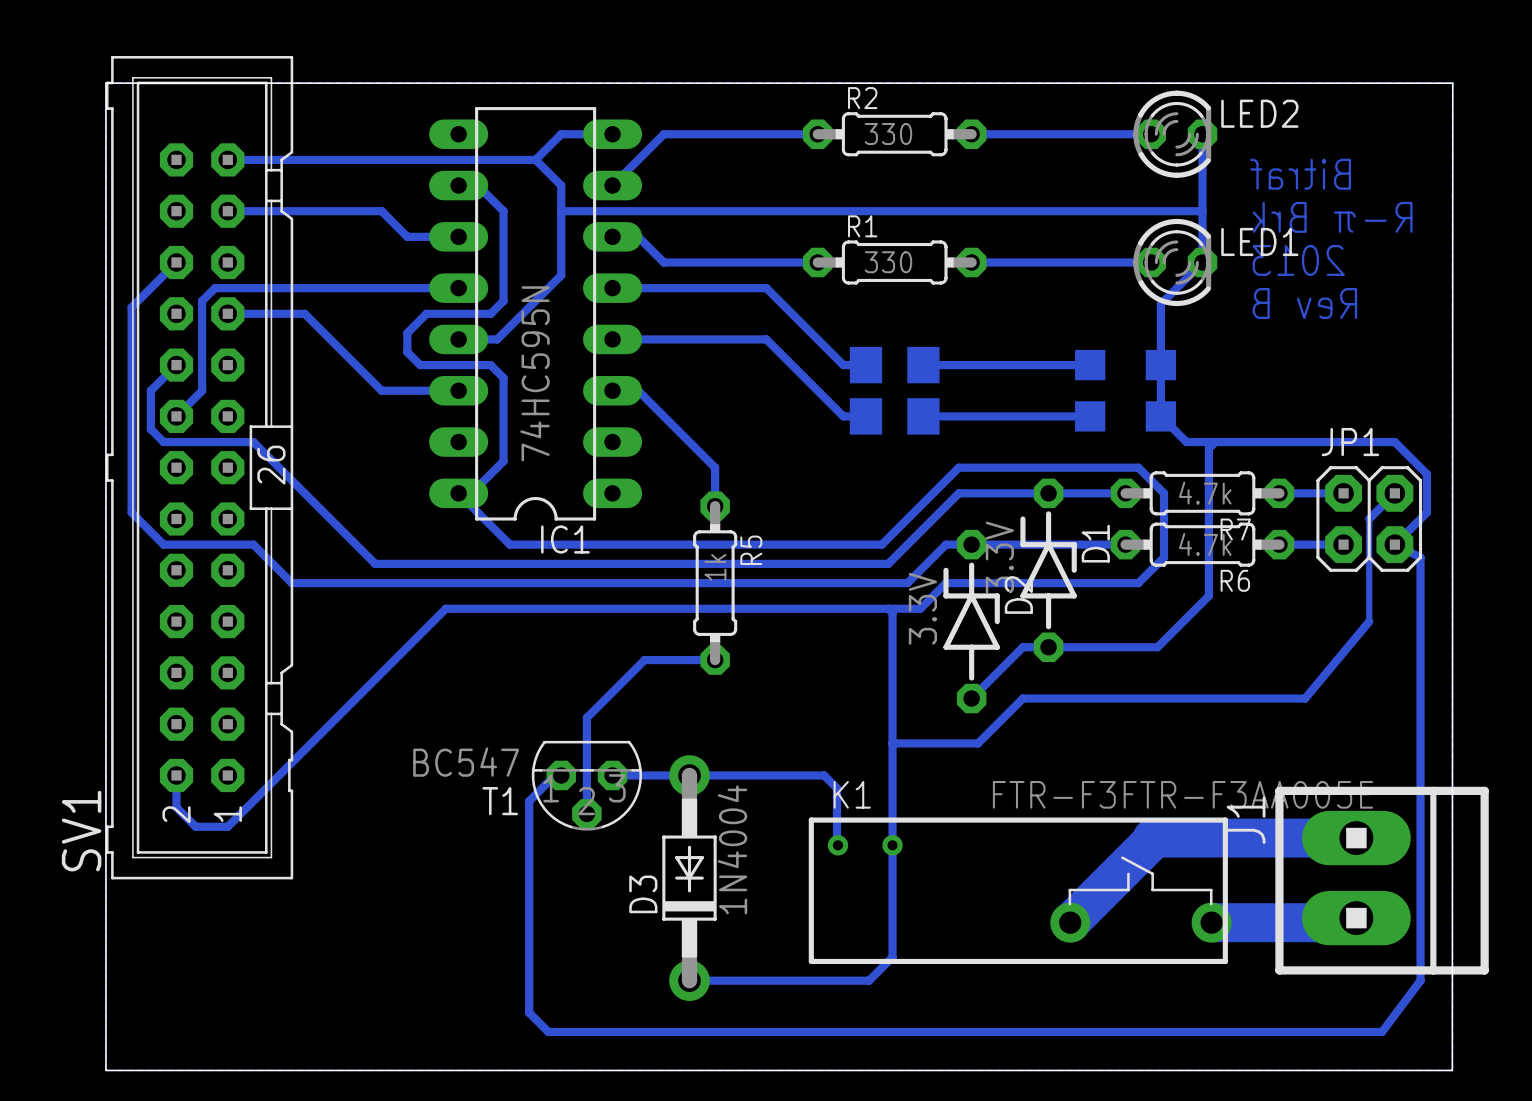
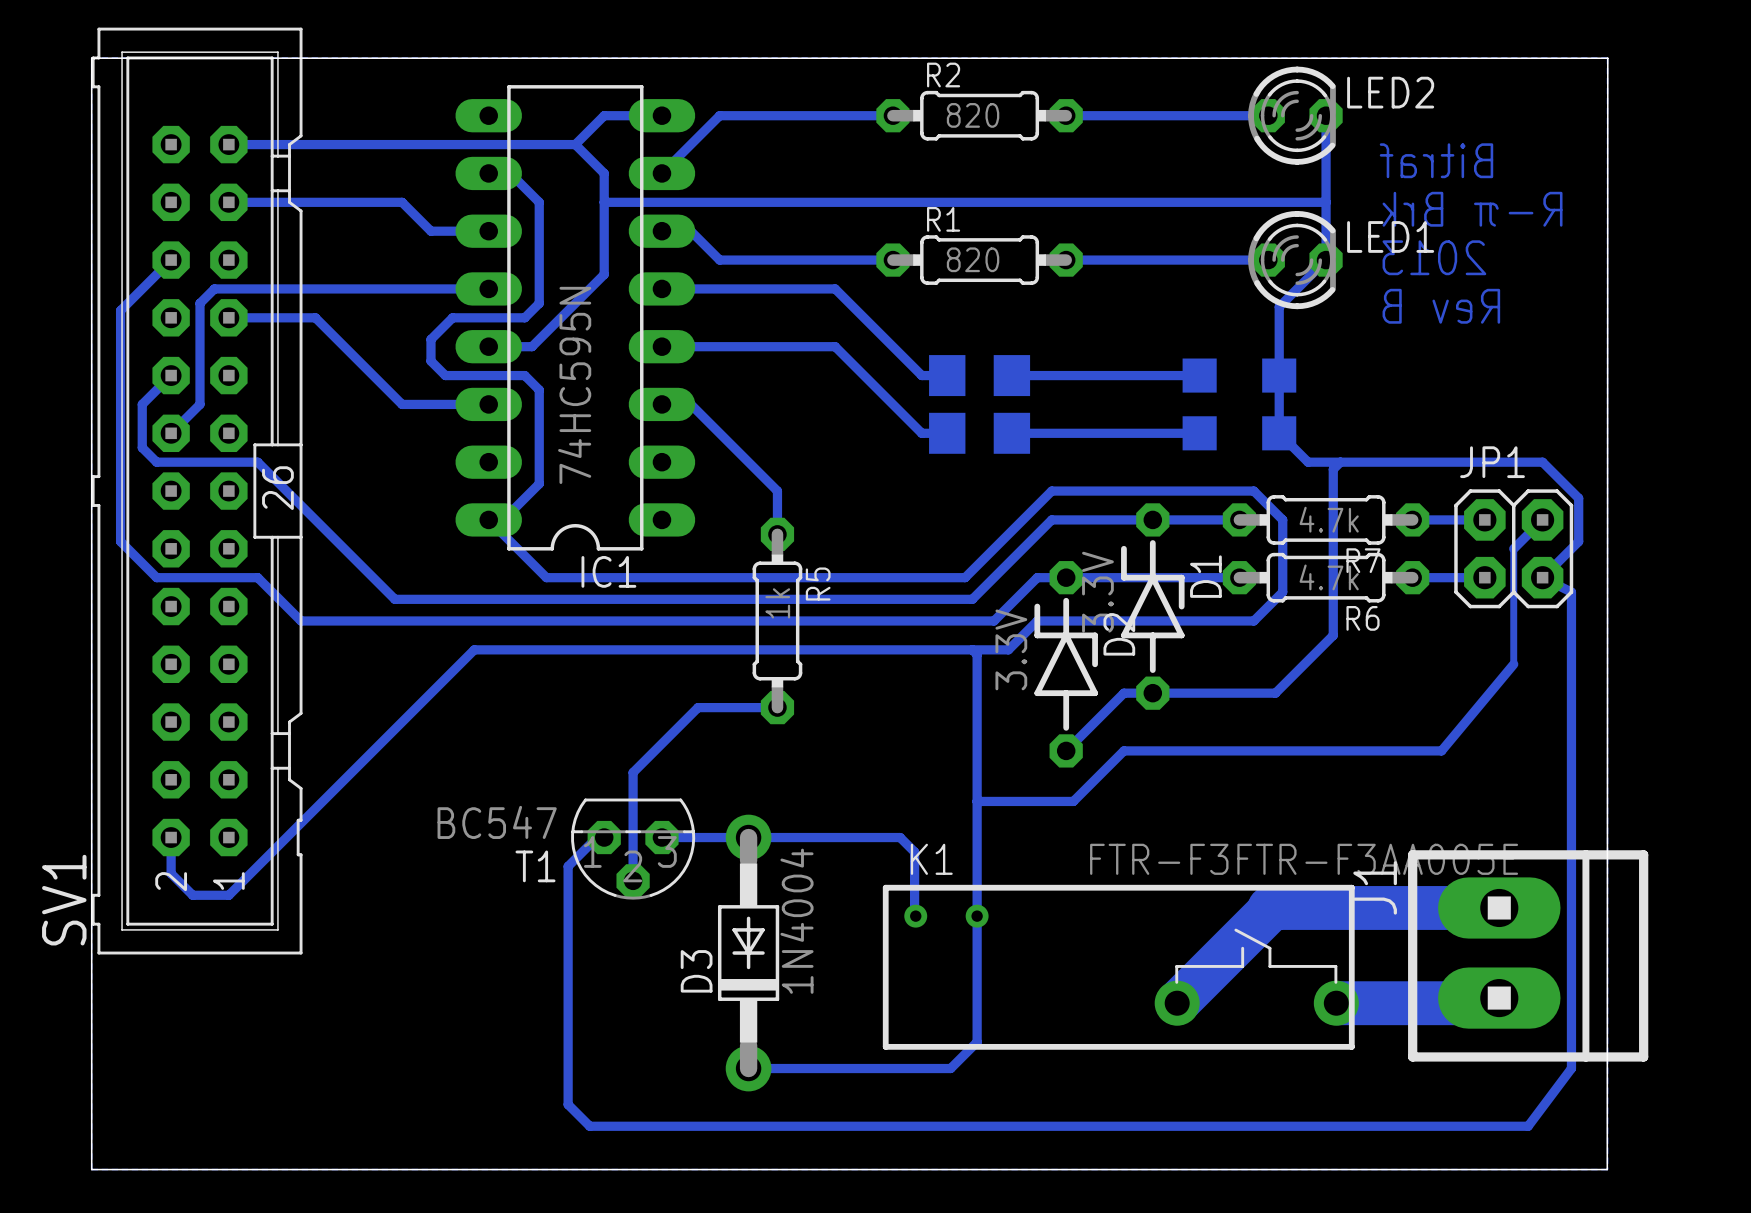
R2 value: 330 (888, 133) -> 820 (973, 115)
R1 value: 330 (888, 262) -> 820 (973, 259)

